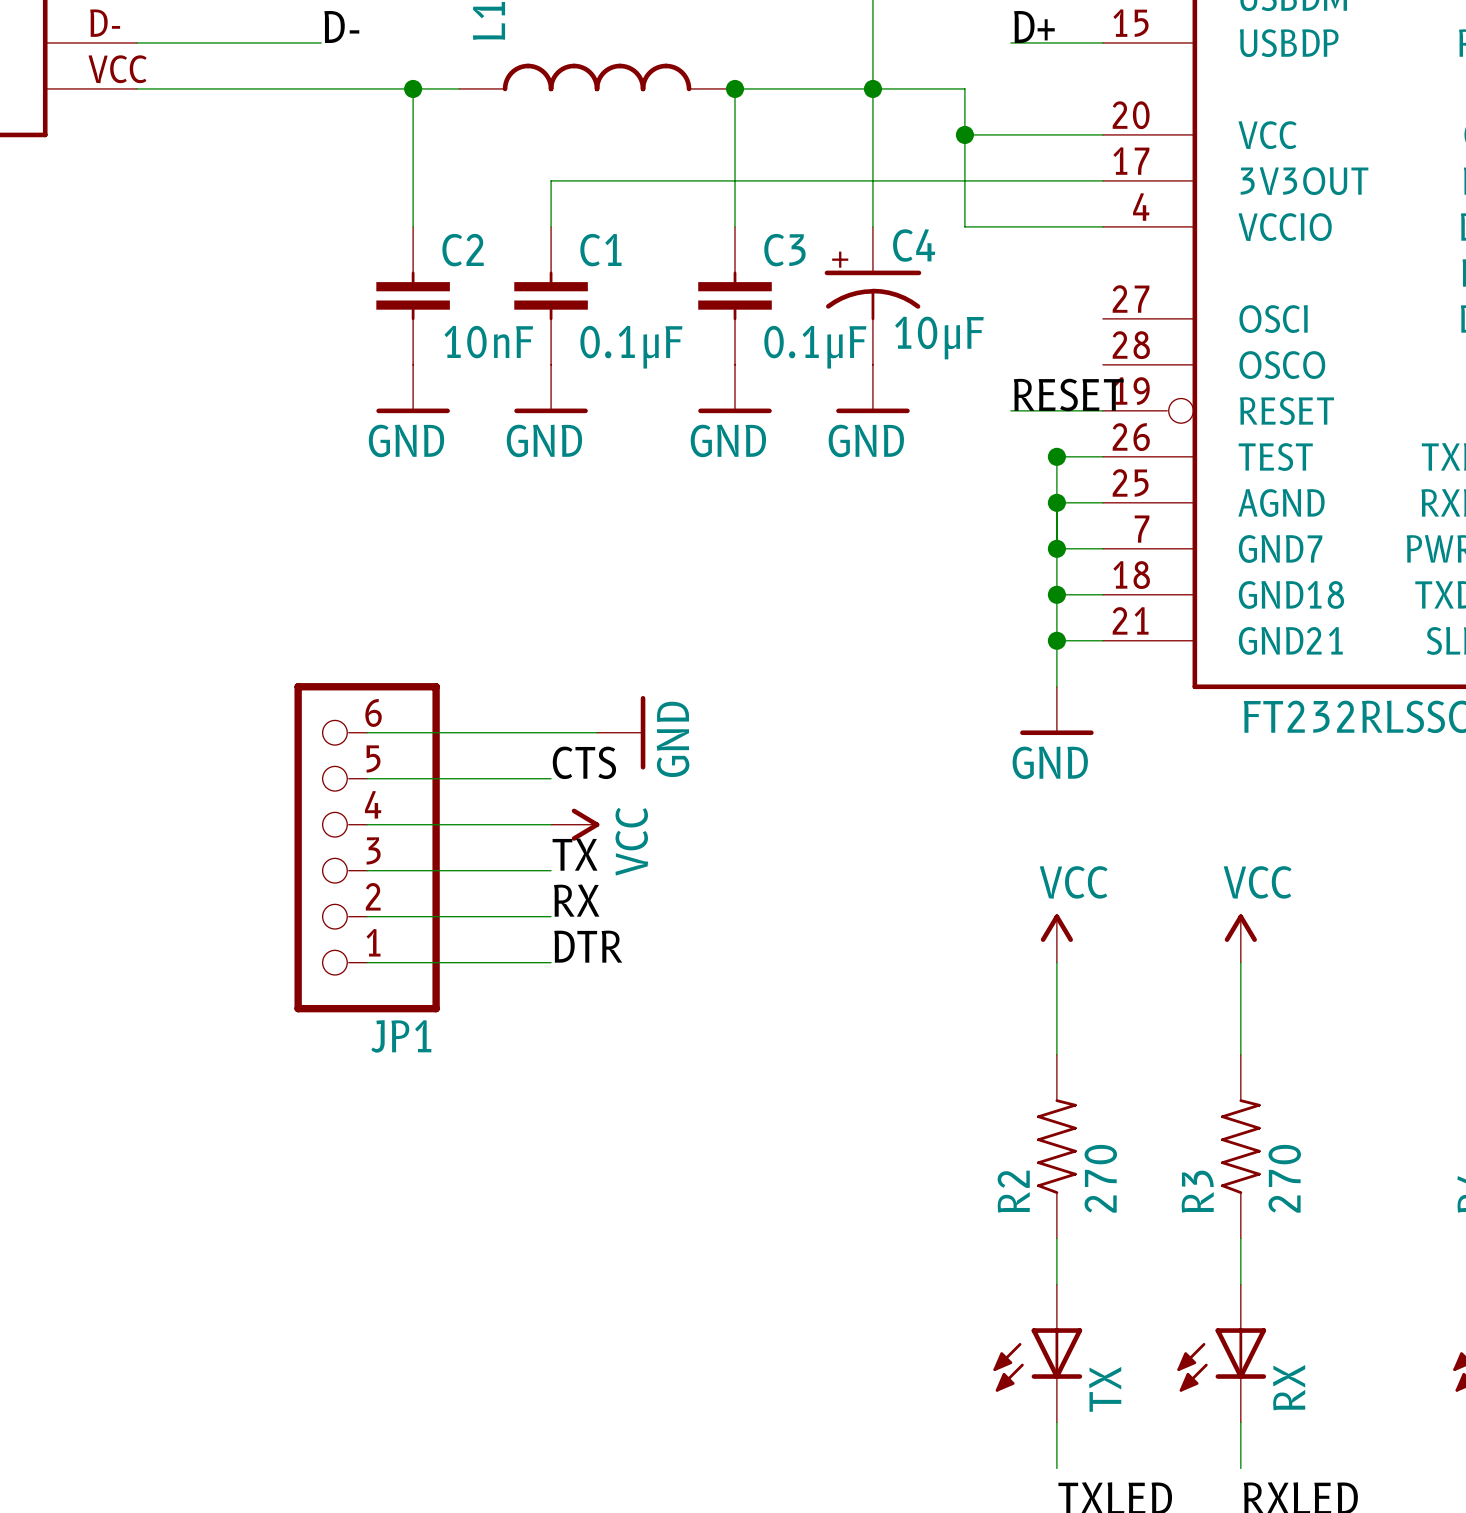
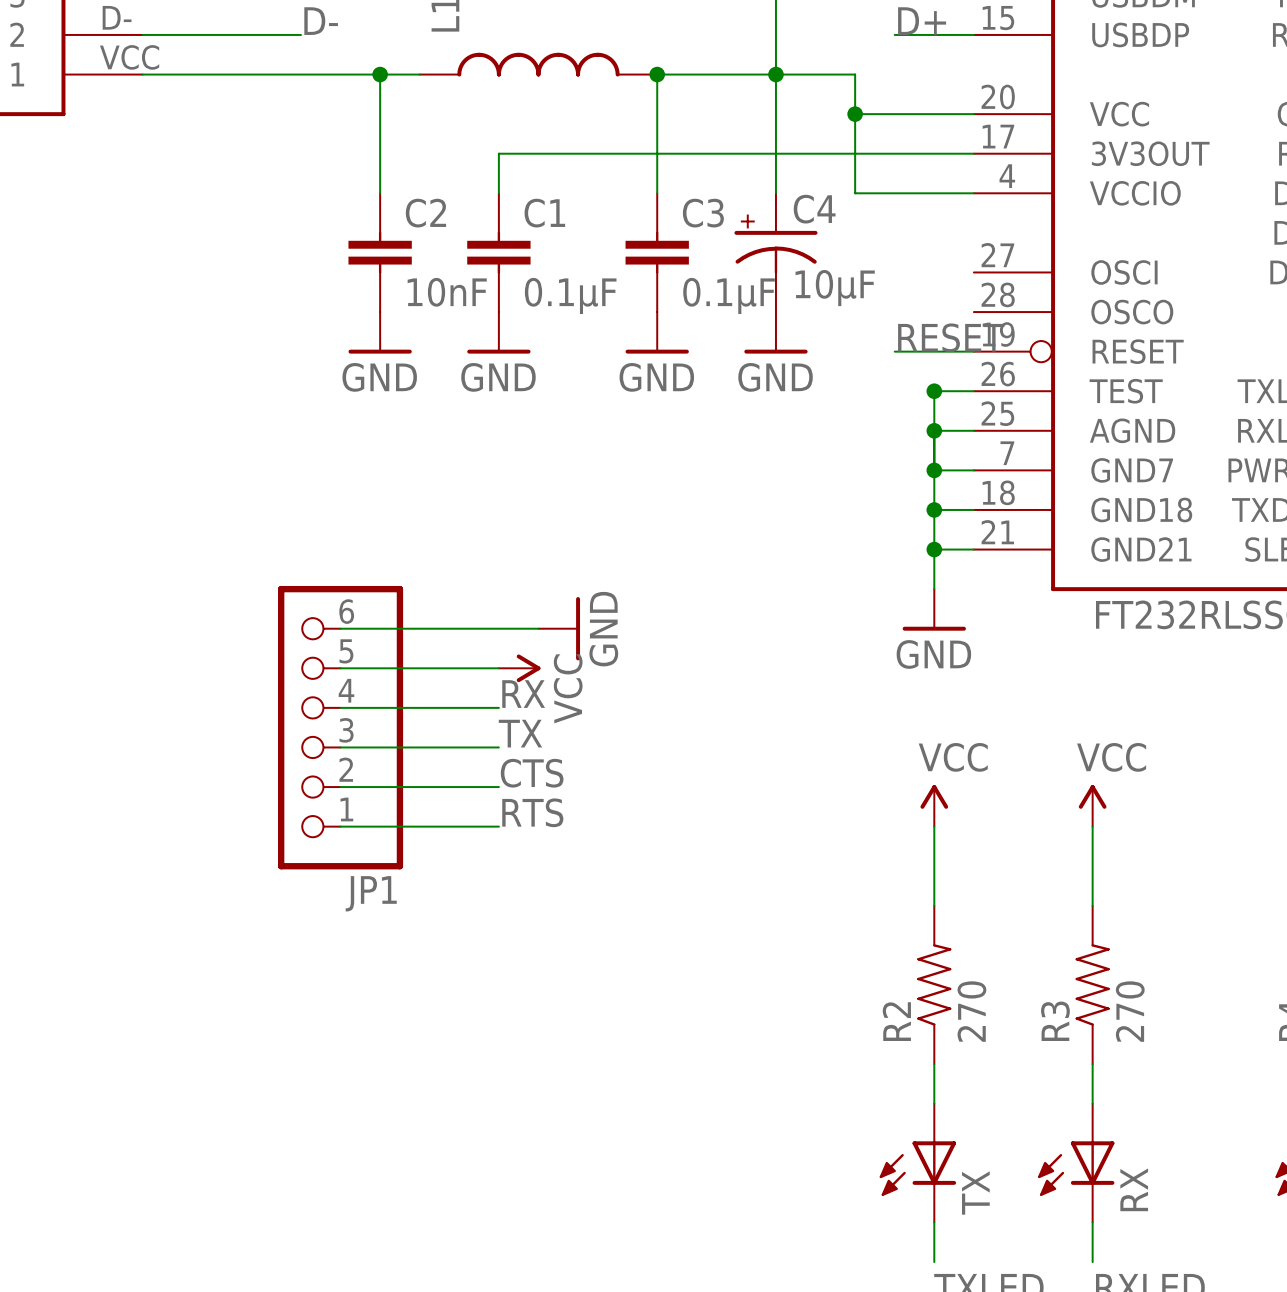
label: CTS (584, 762) -> none
label: none -> RX (523, 694)
power symbol position: VCC (575, 824) -> VCC (519, 668)
label: RX (576, 900) -> CTS (532, 773)
label: DTR (588, 946) -> RTS (532, 812)

